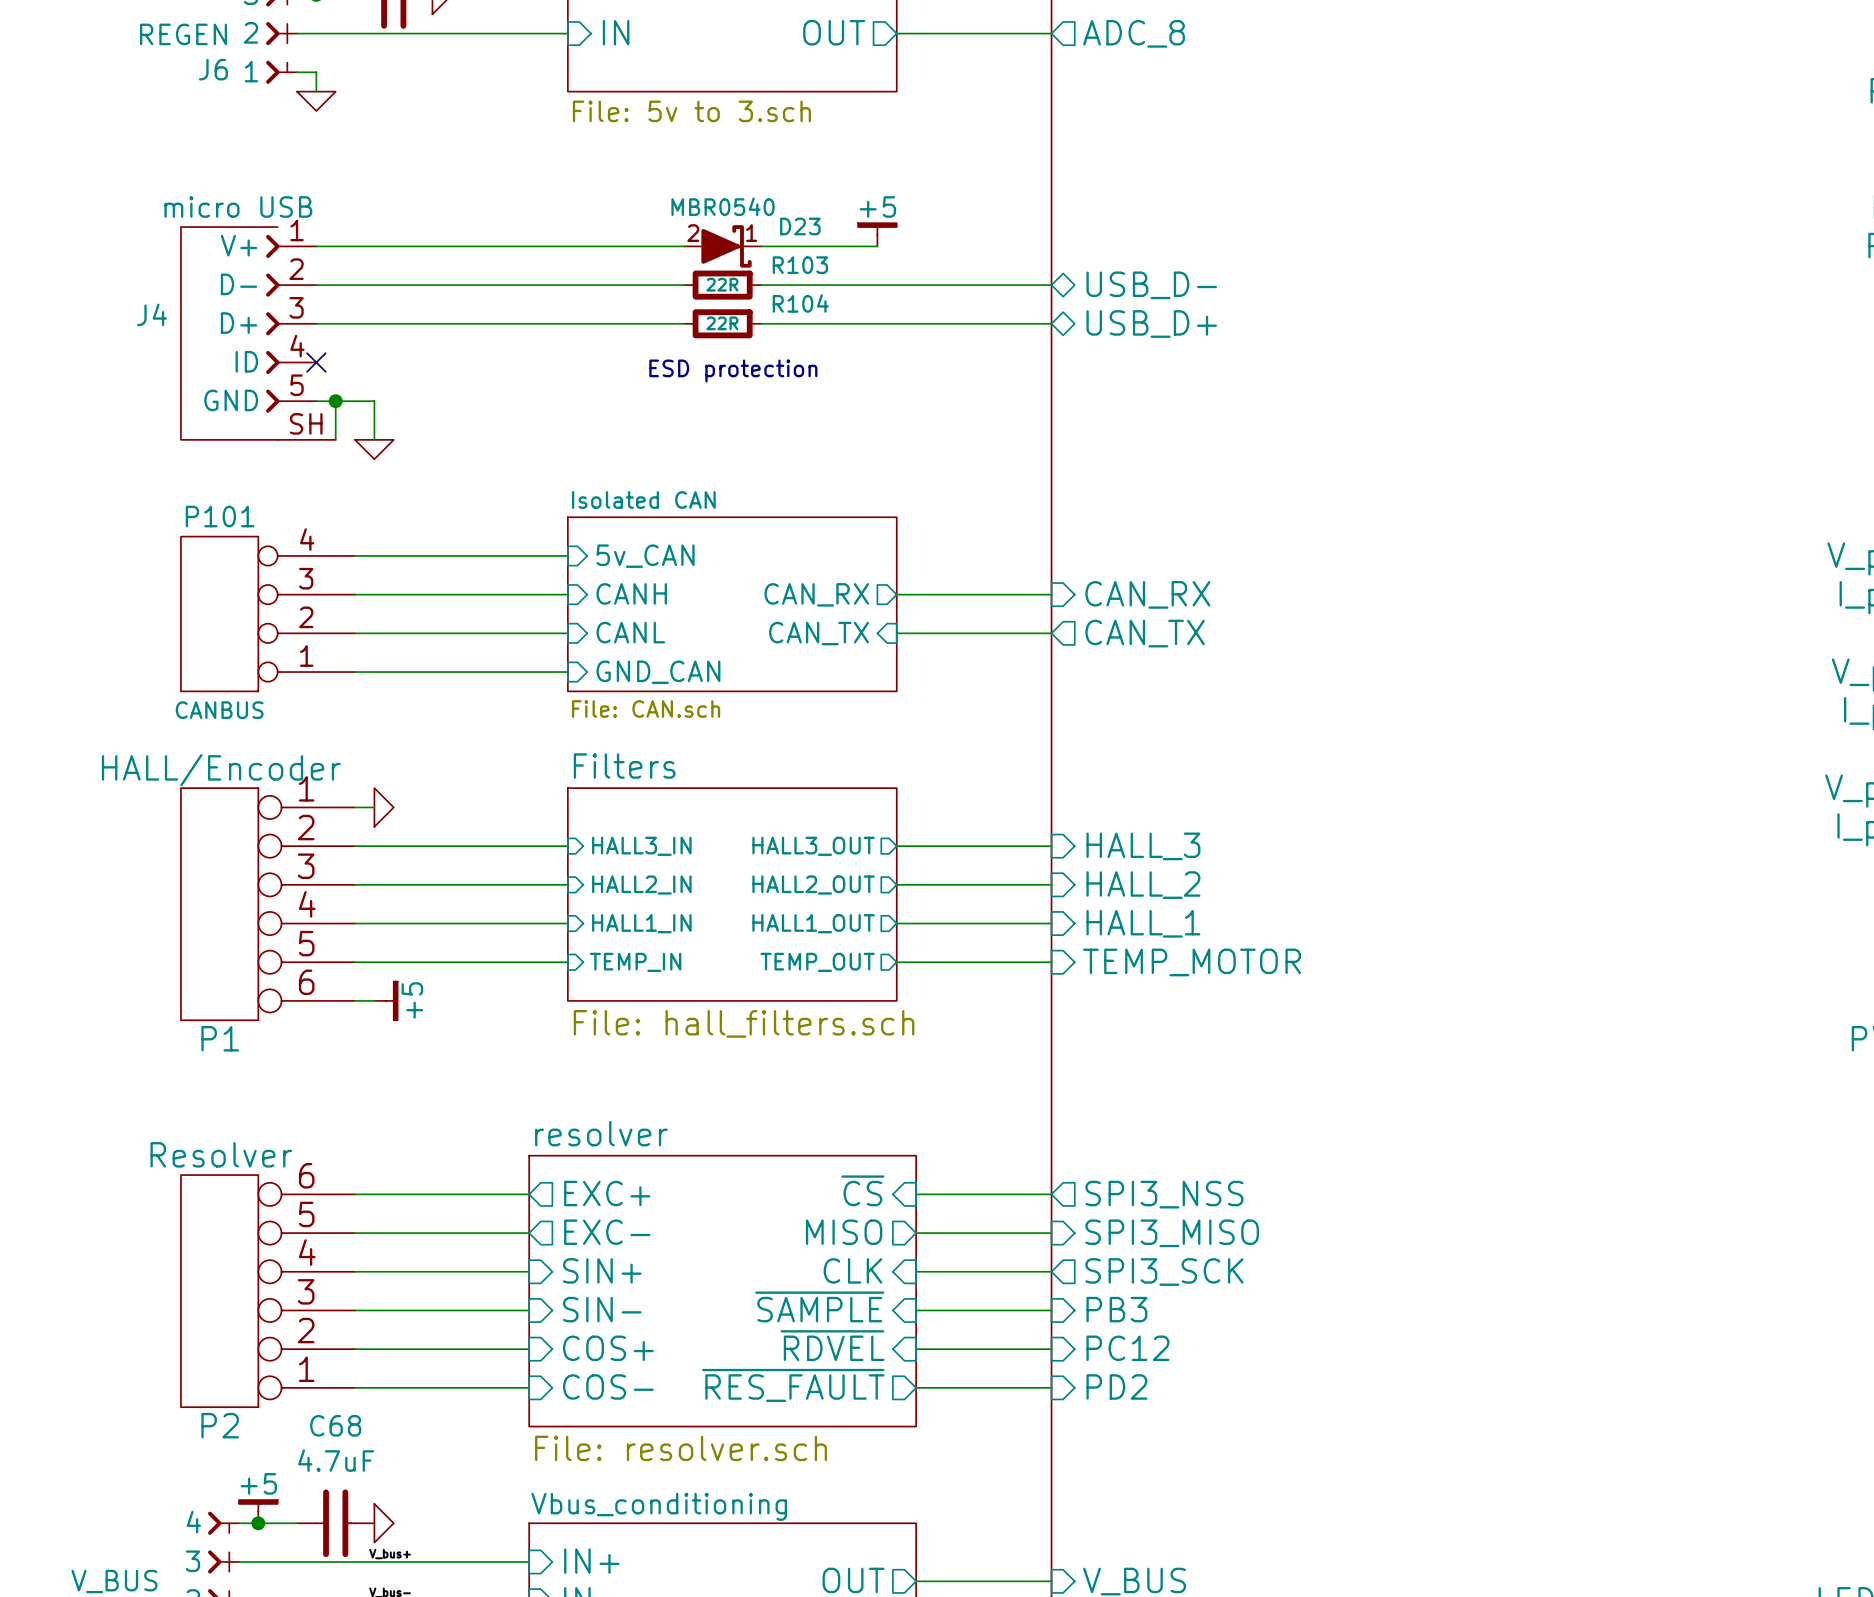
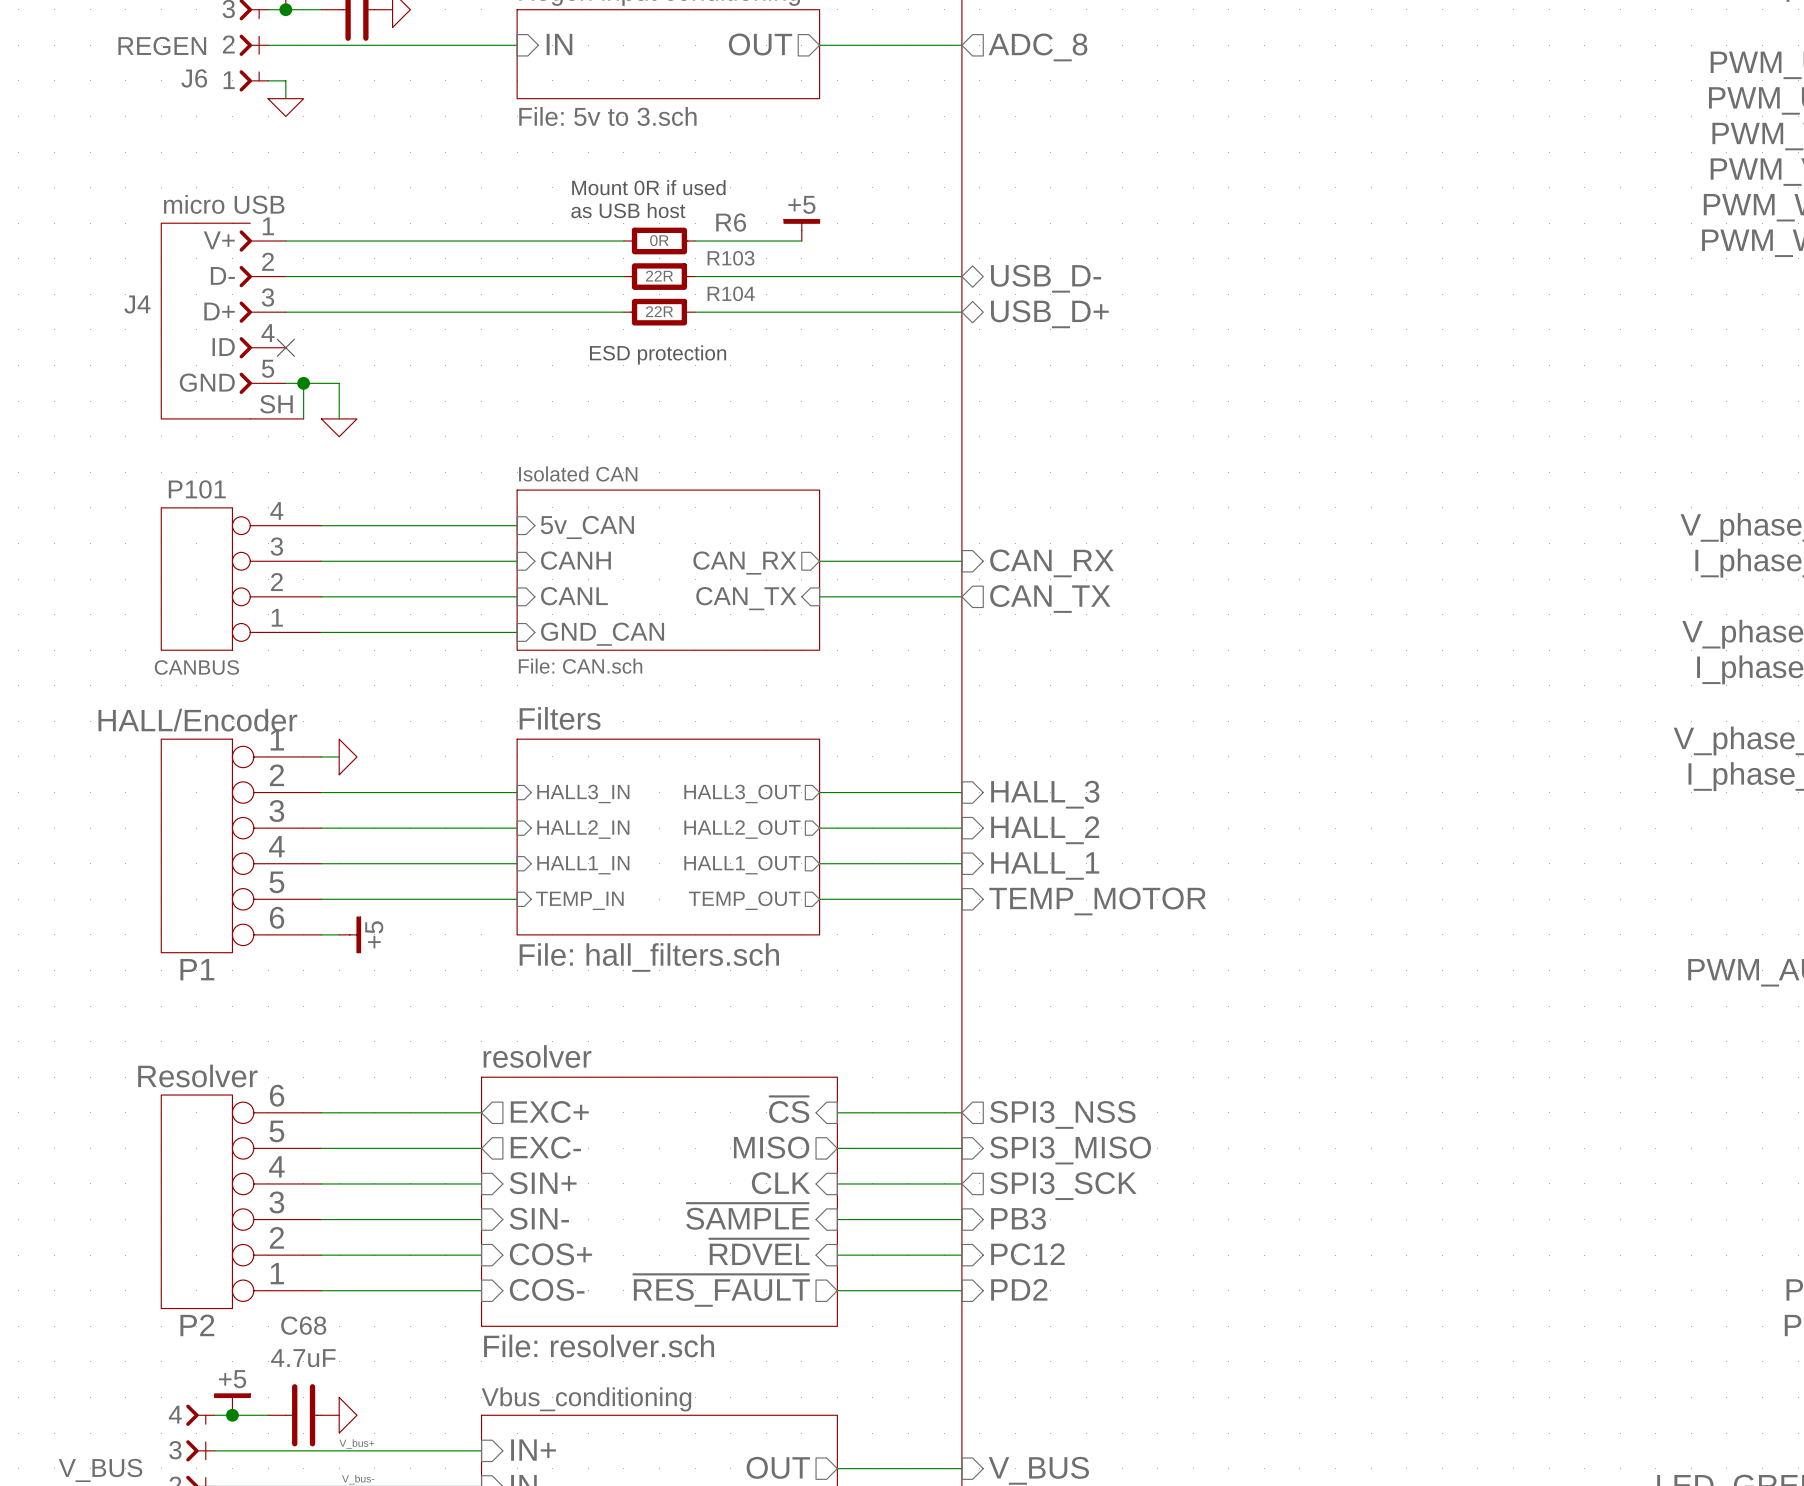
text: none -> Mount 0R if used (648, 187)
text: none -> as USB host (628, 210)
D23: MBR0540 (722, 246) -> none
R6: none -> 0R (659, 241)

